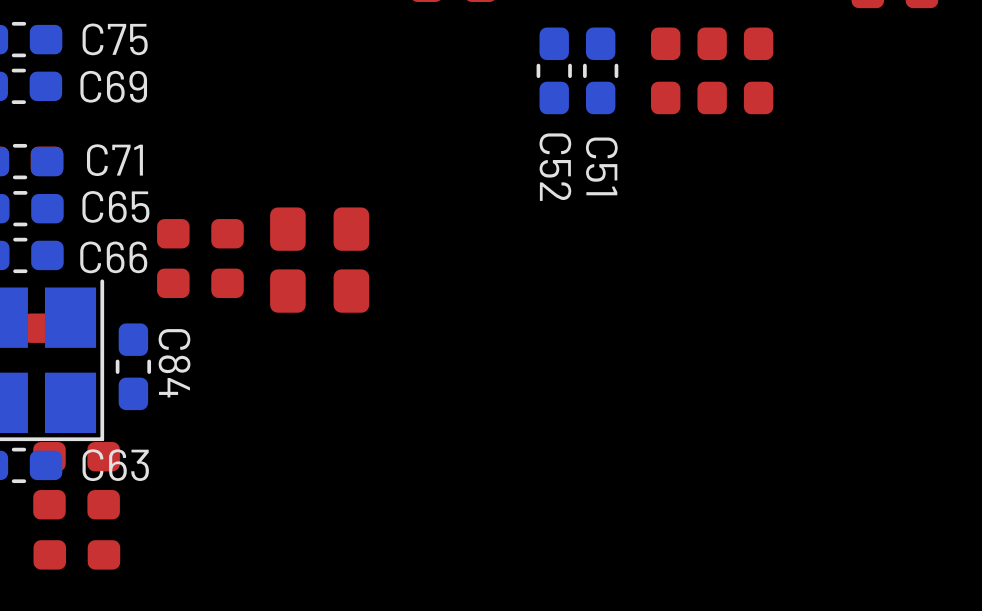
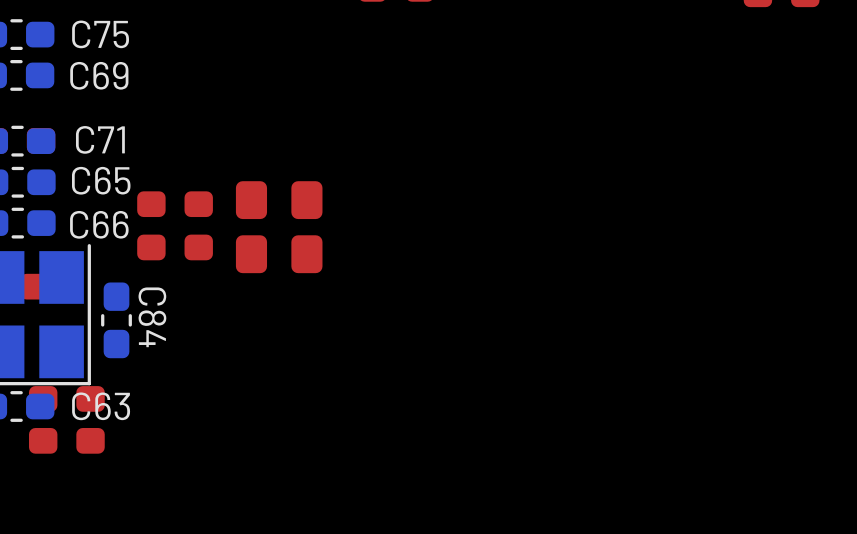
C52: (554, 70) -> none
C51: (600, 70) -> none
part: (665, 70) -> none
part: (712, 70) -> none
part: (758, 70) -> none
part: (76, 554) -> none

